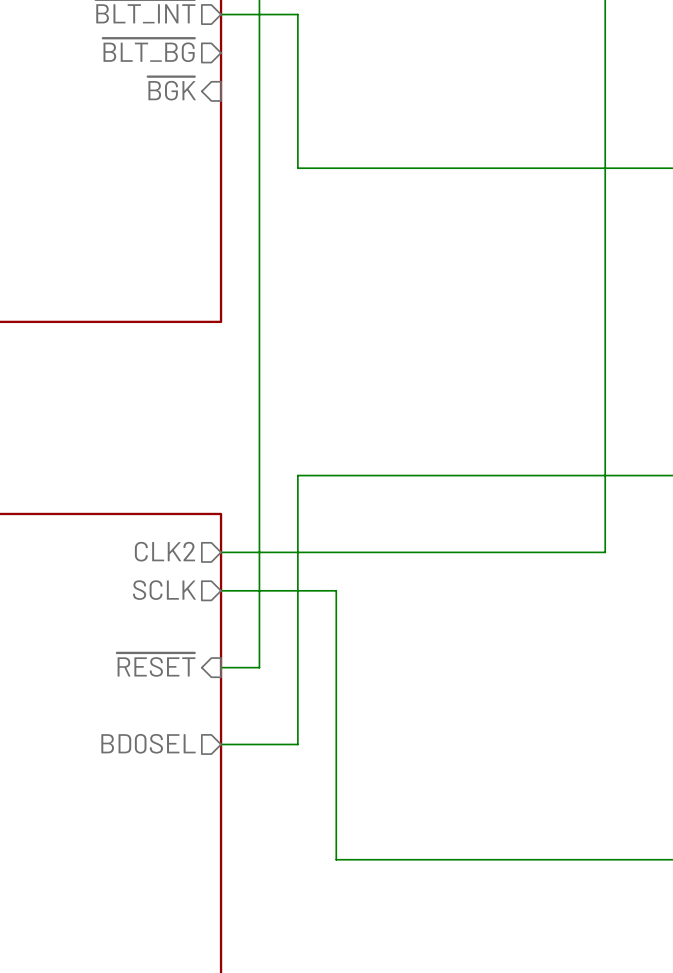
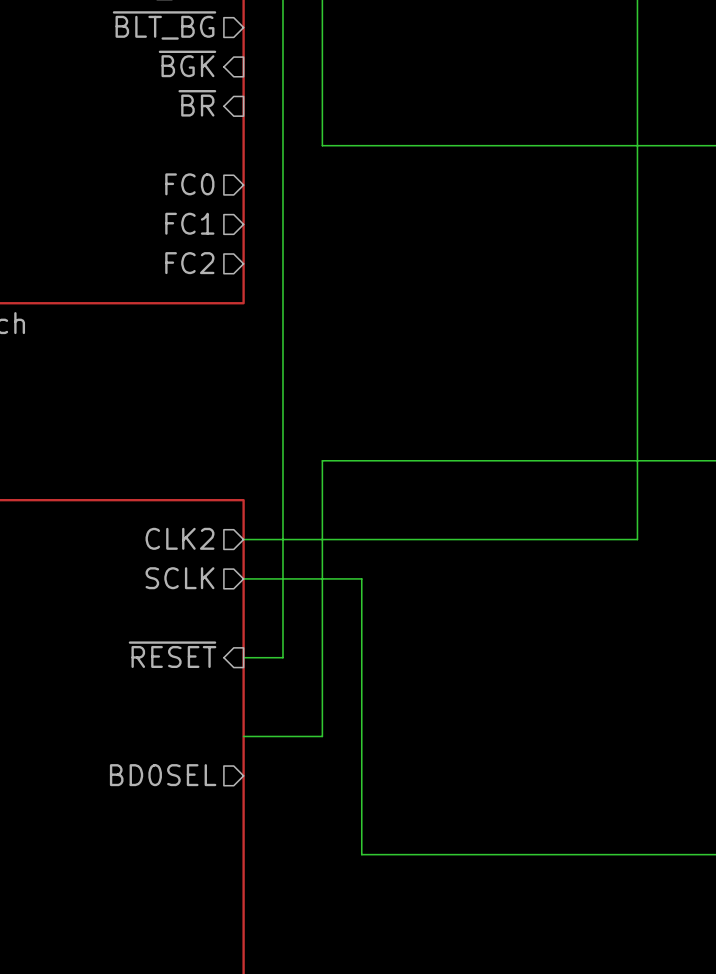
sheet pin: none -> ~{BR} (197, 103)
sheet pin: none -> FC0 (189, 184)
sheet pin: none -> FC1 (189, 223)
sheet pin: none -> FC2 (189, 263)
sheet pin position: BD0SEL (148, 743) -> BD0SEL (163, 775)

